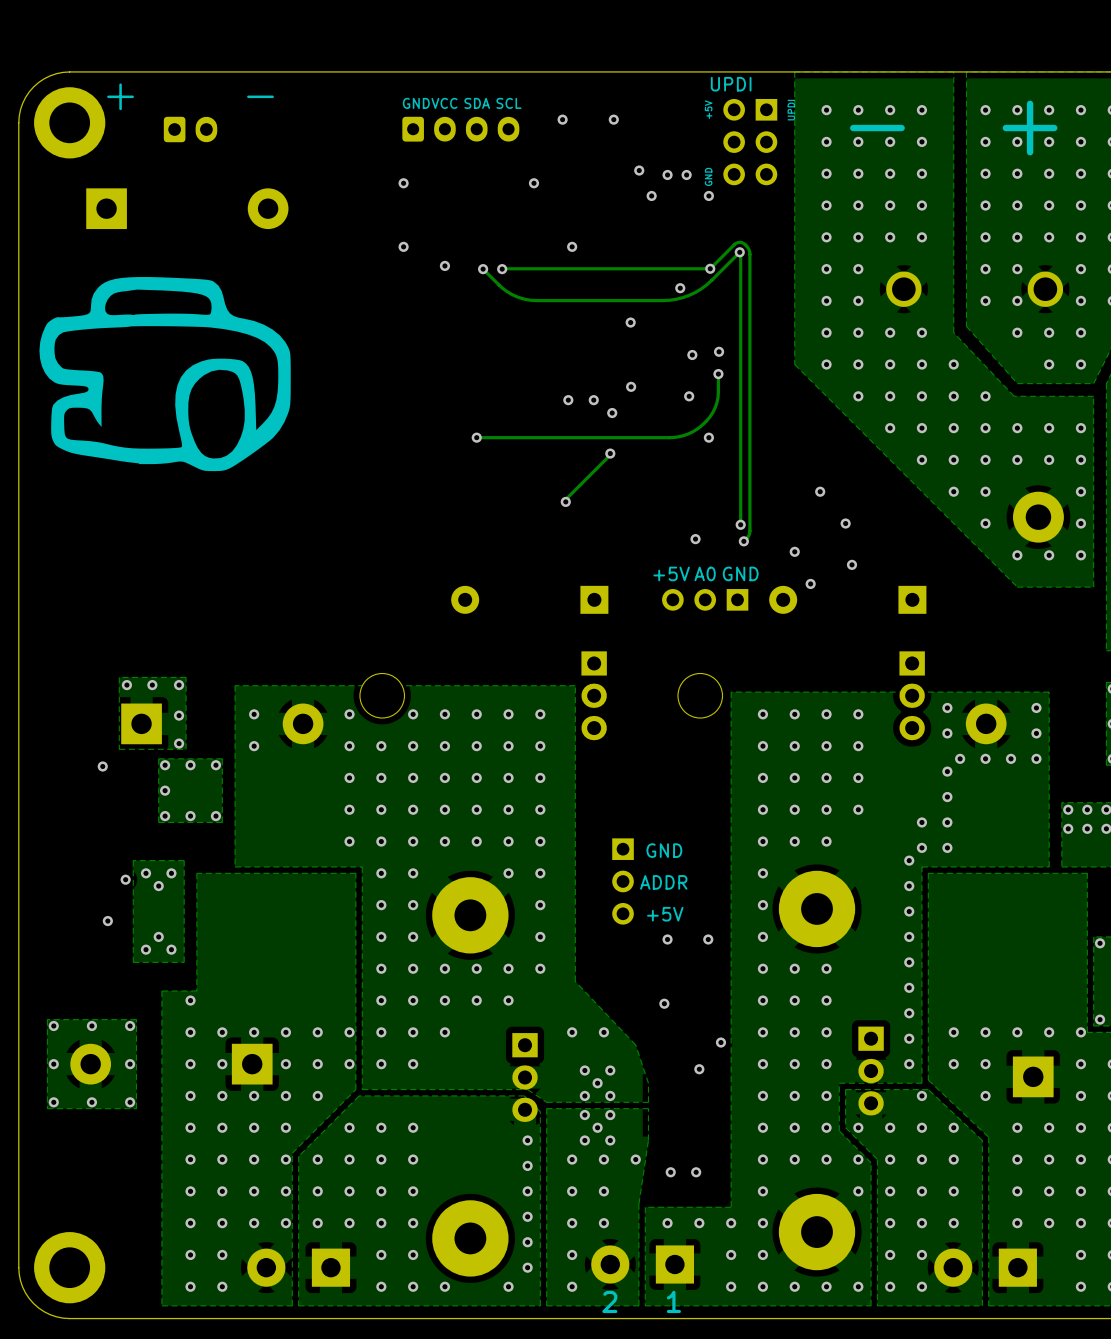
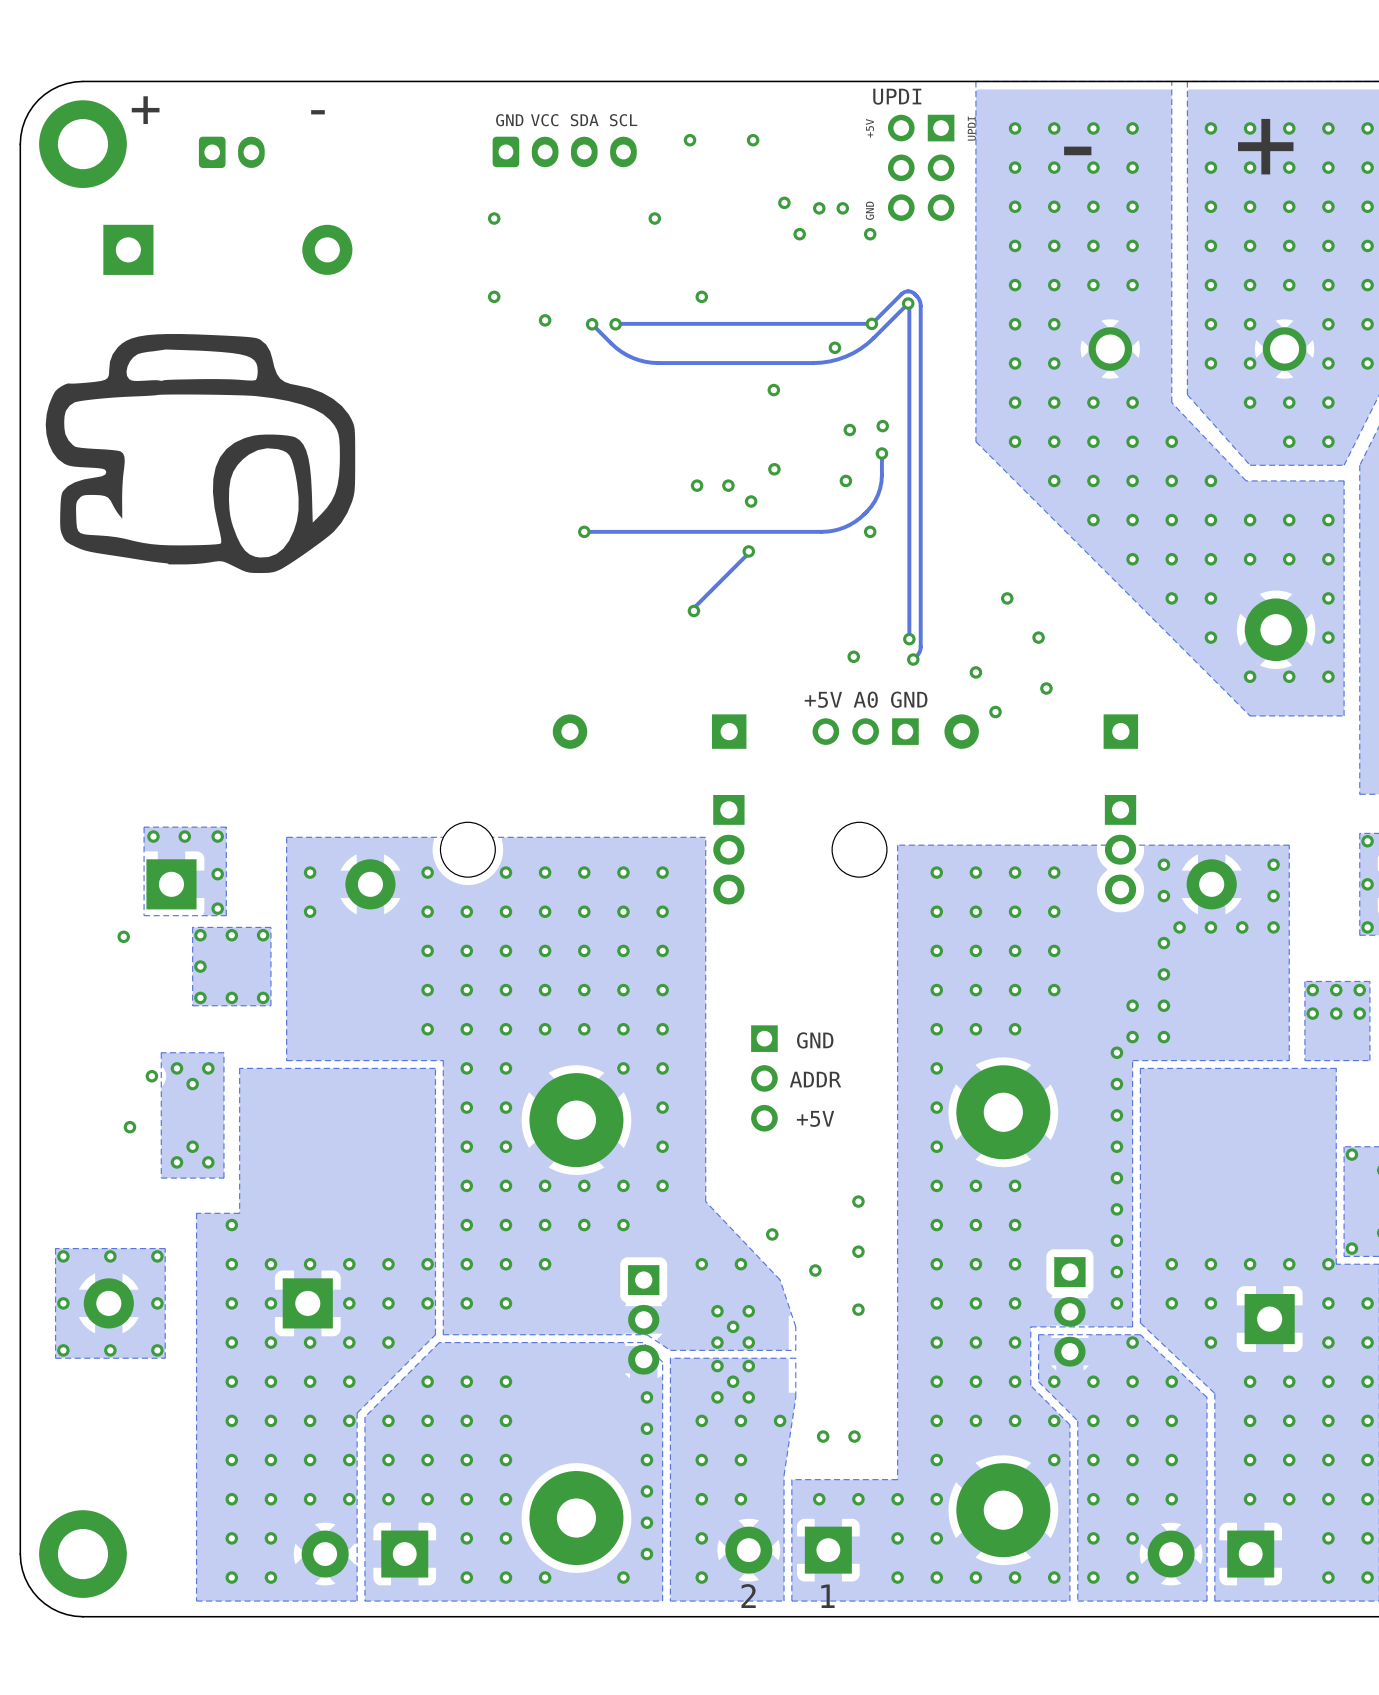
via: (667, 939) -> none
via: (708, 939) -> none
via: none -> (858, 1201)
via: (664, 1003) -> none
via: none -> (772, 1234)
via: none -> (858, 1251)
via: none -> (815, 1270)
via: (720, 1042) -> none

